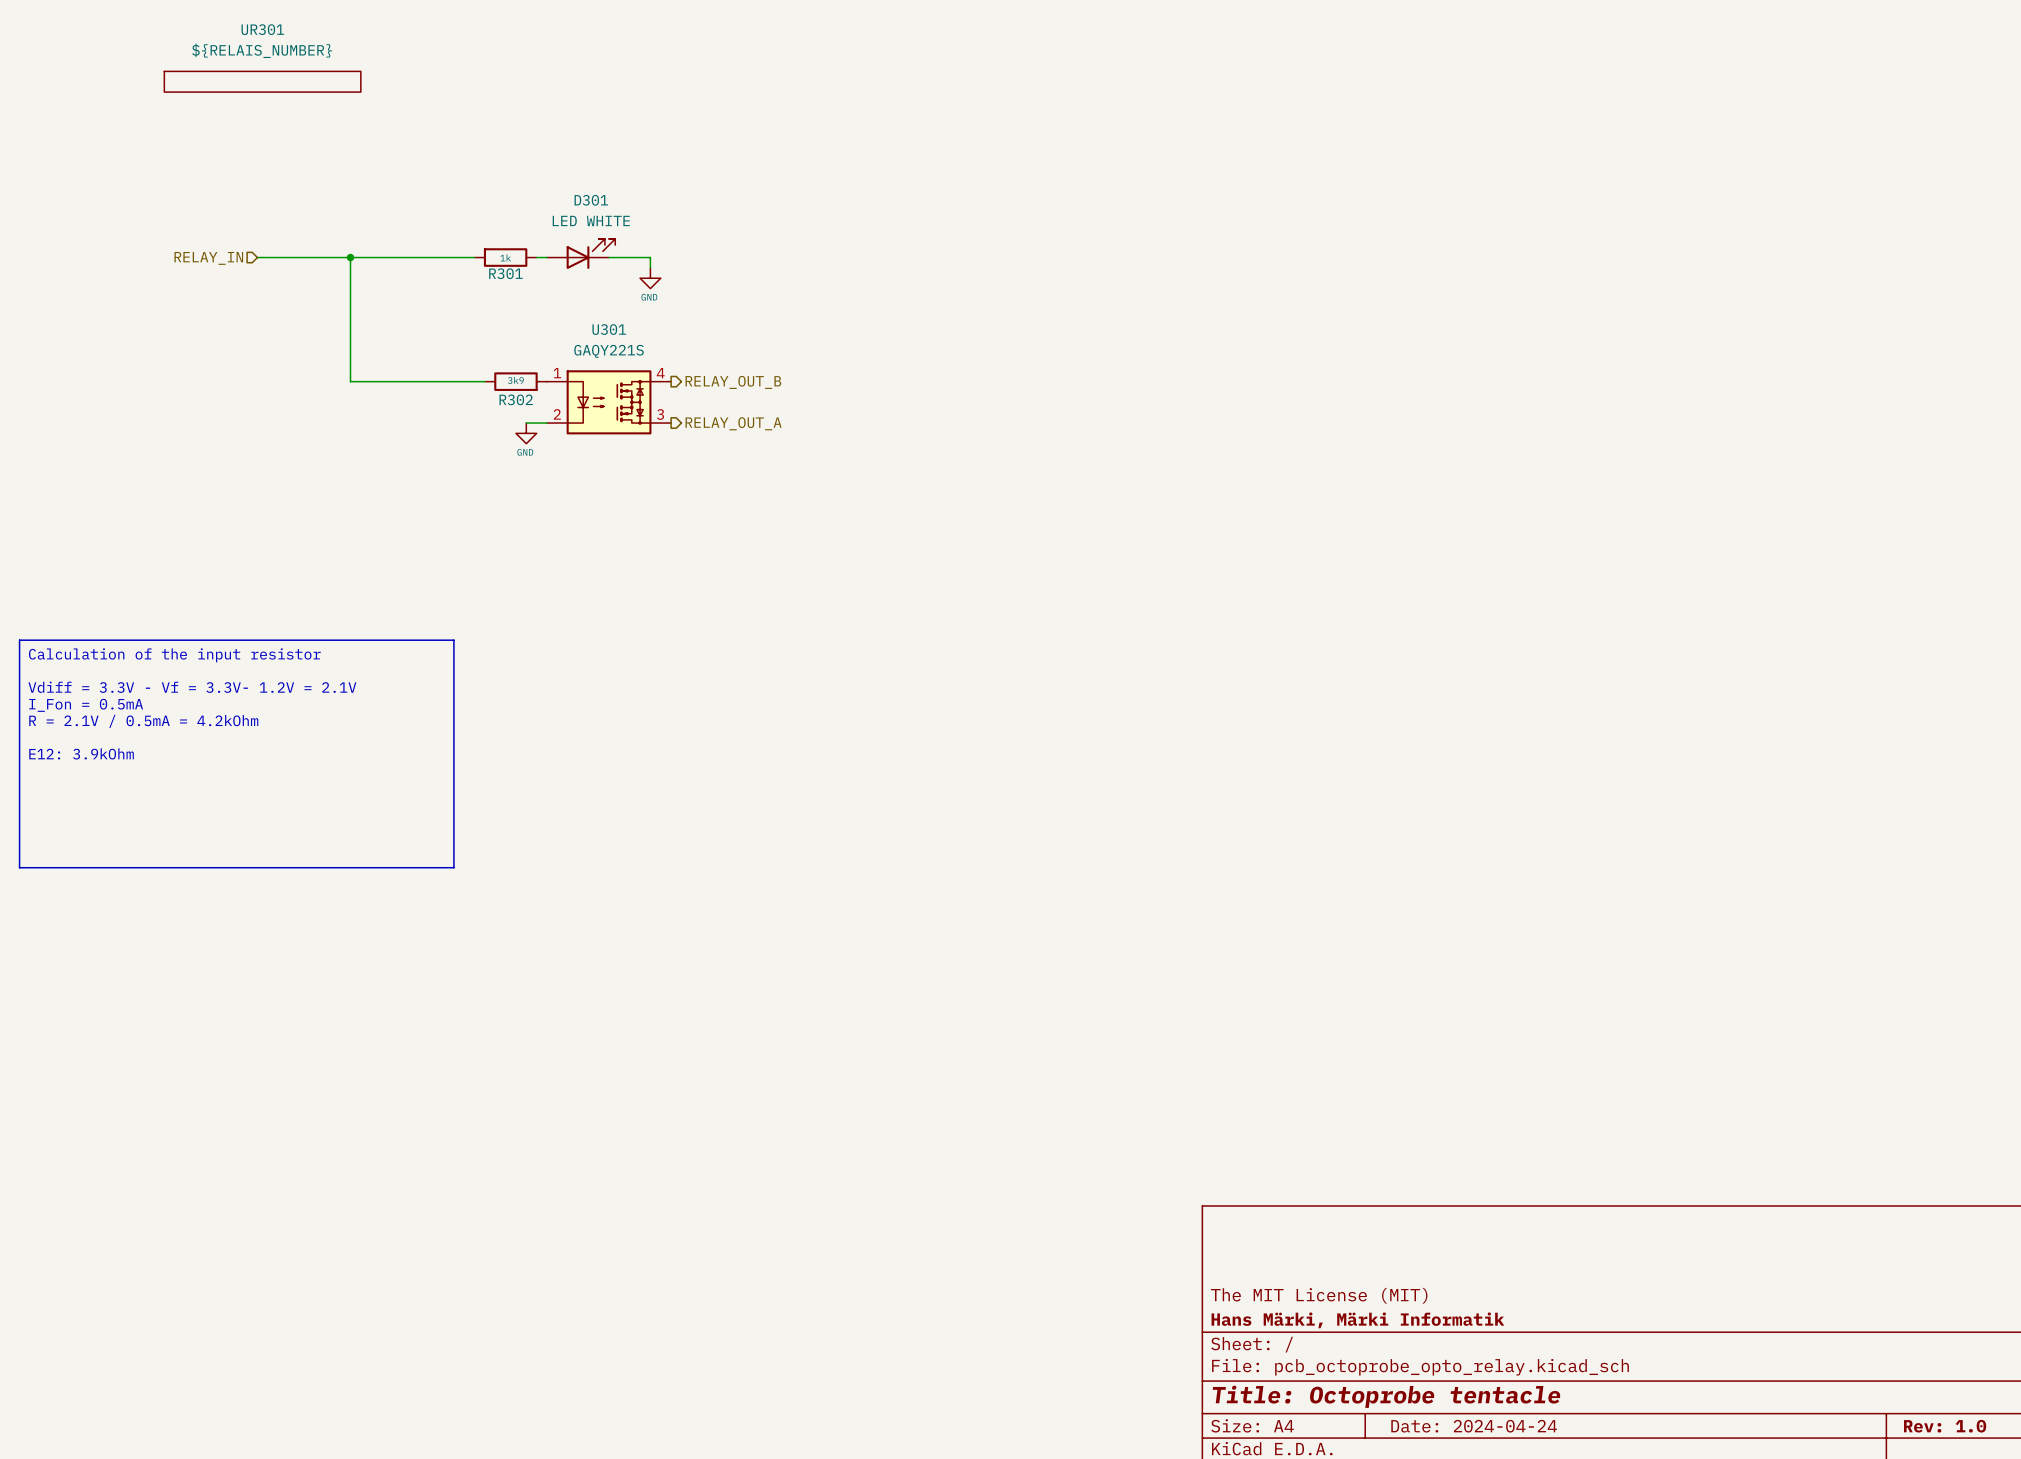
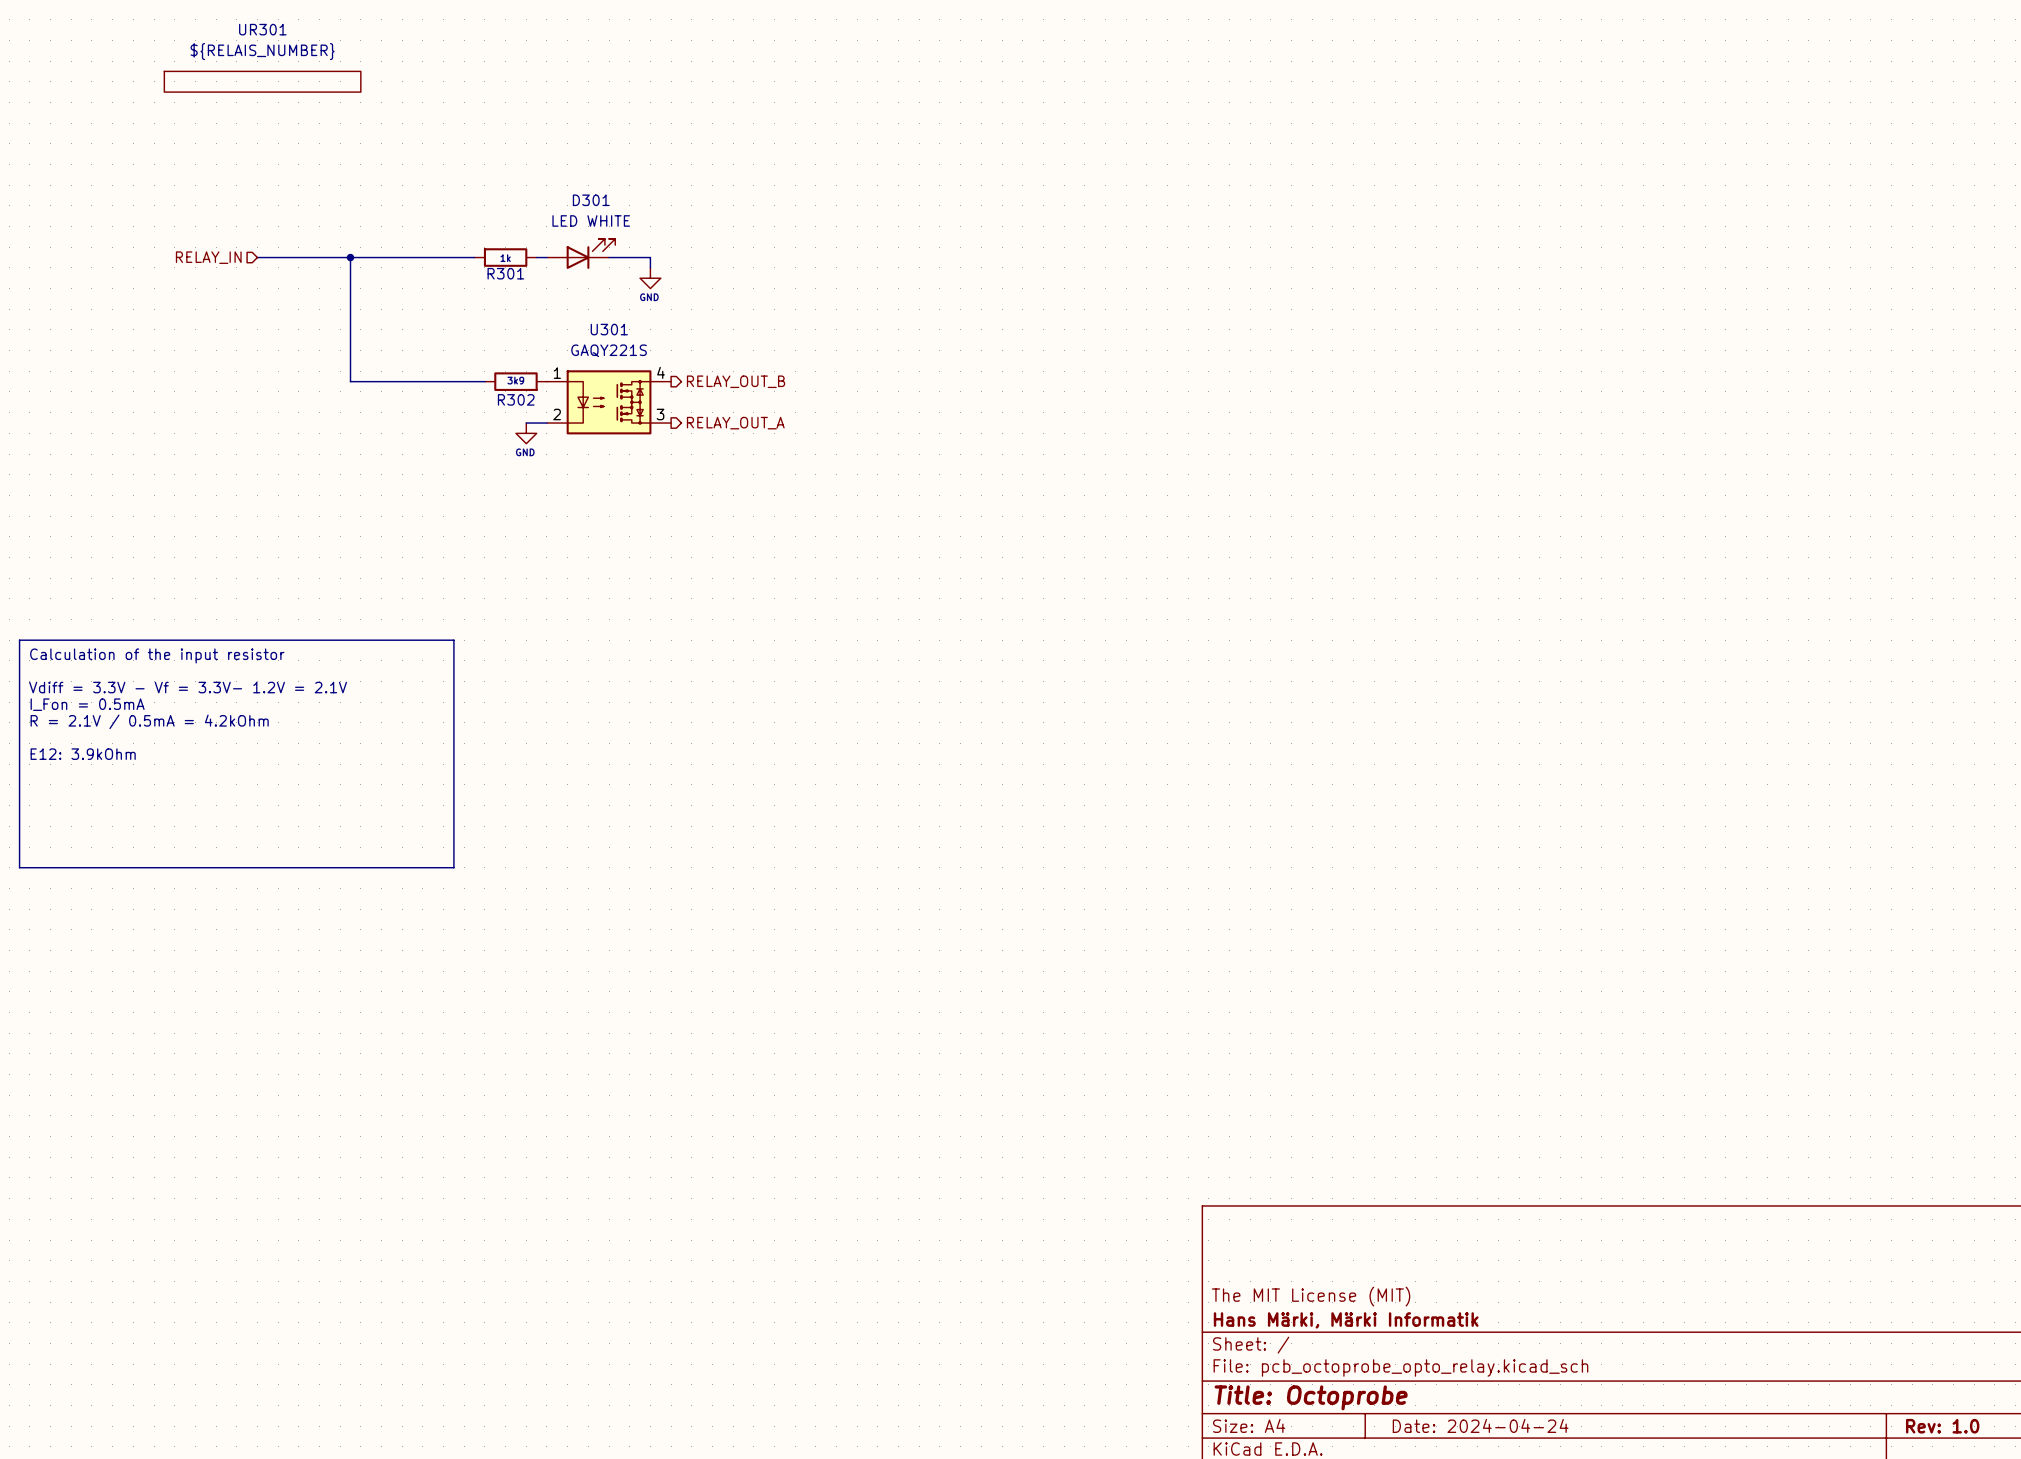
title block: Title: Octoprobe tentacle (1386, 1396) -> Title: Octoprobe (1311, 1397)

